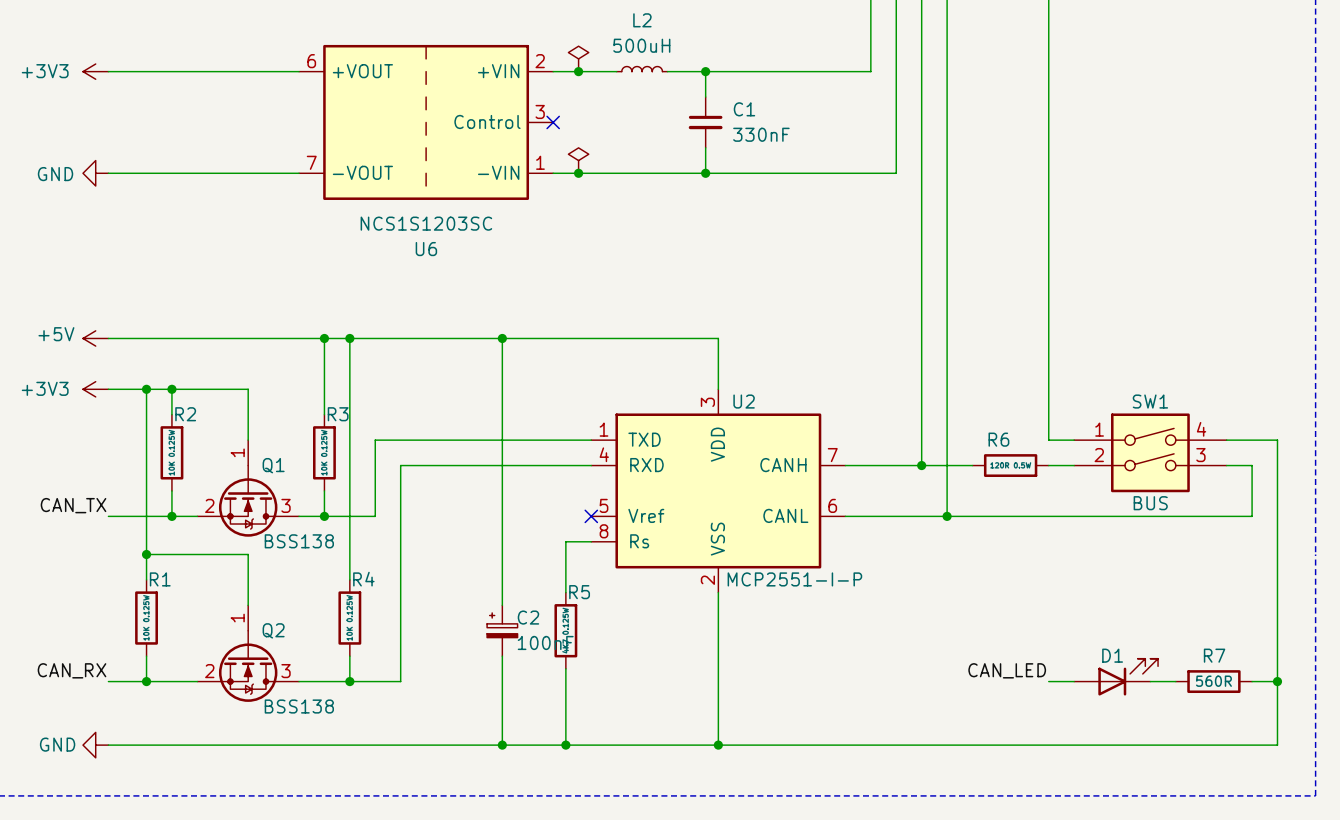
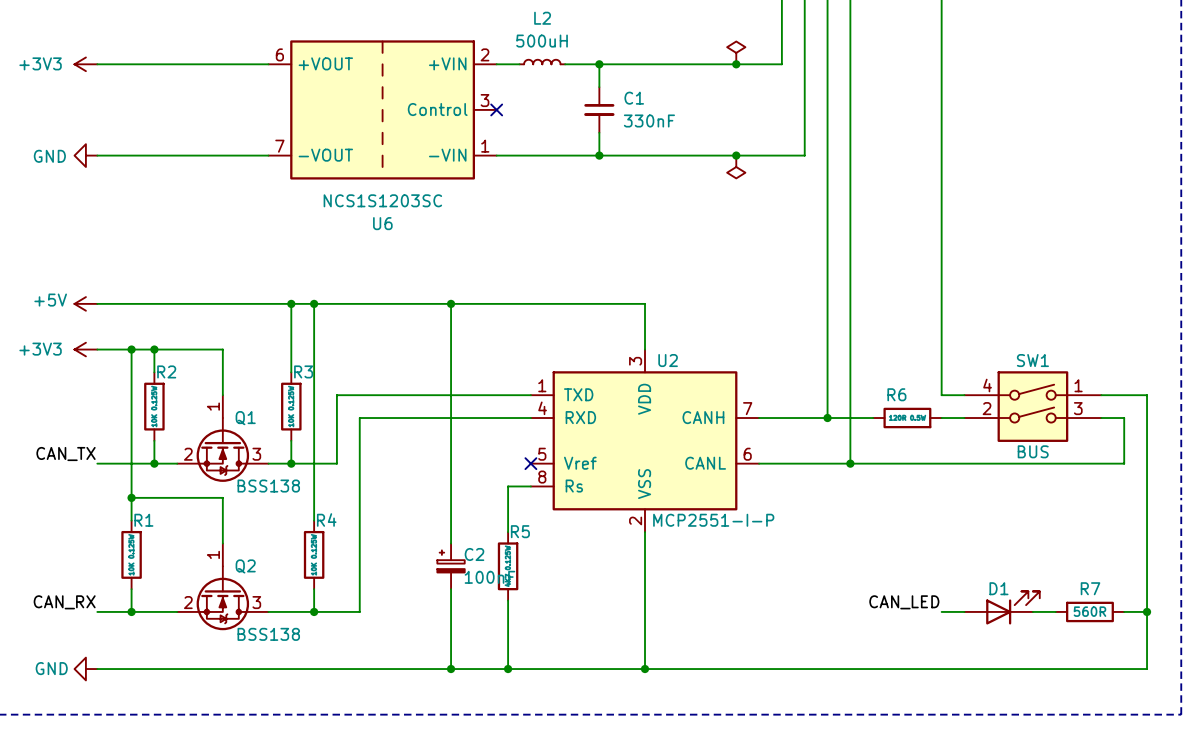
power symbol: (578, 58) -> none
power symbol: none -> (736, 52)
L2 position: (642, 69) -> (542, 62)
wire: (578, 71) (616, 71) -> none
junction: (578, 71) -> none
wire: none -> (565, 64) (599, 64) (599, 87)
wire: (705, 71) (705, 97) -> none
junction position: (705, 71) -> (599, 64)
junction: none -> (736, 64)
C1 position: (705, 122) -> (599, 109)
wire: (705, 147) (705, 173) -> (599, 132) (599, 155)
power symbol: (578, 160) -> none
junction: (578, 173) -> none
junction position: (705, 173) -> (599, 155)
junction: none -> (736, 155)
power symbol: none -> (736, 167)
SW1 pin number: 1 (1099, 429) -> 4 (987, 385)
SW1 pin number: 4 (1201, 429) -> 1 (1078, 385)

